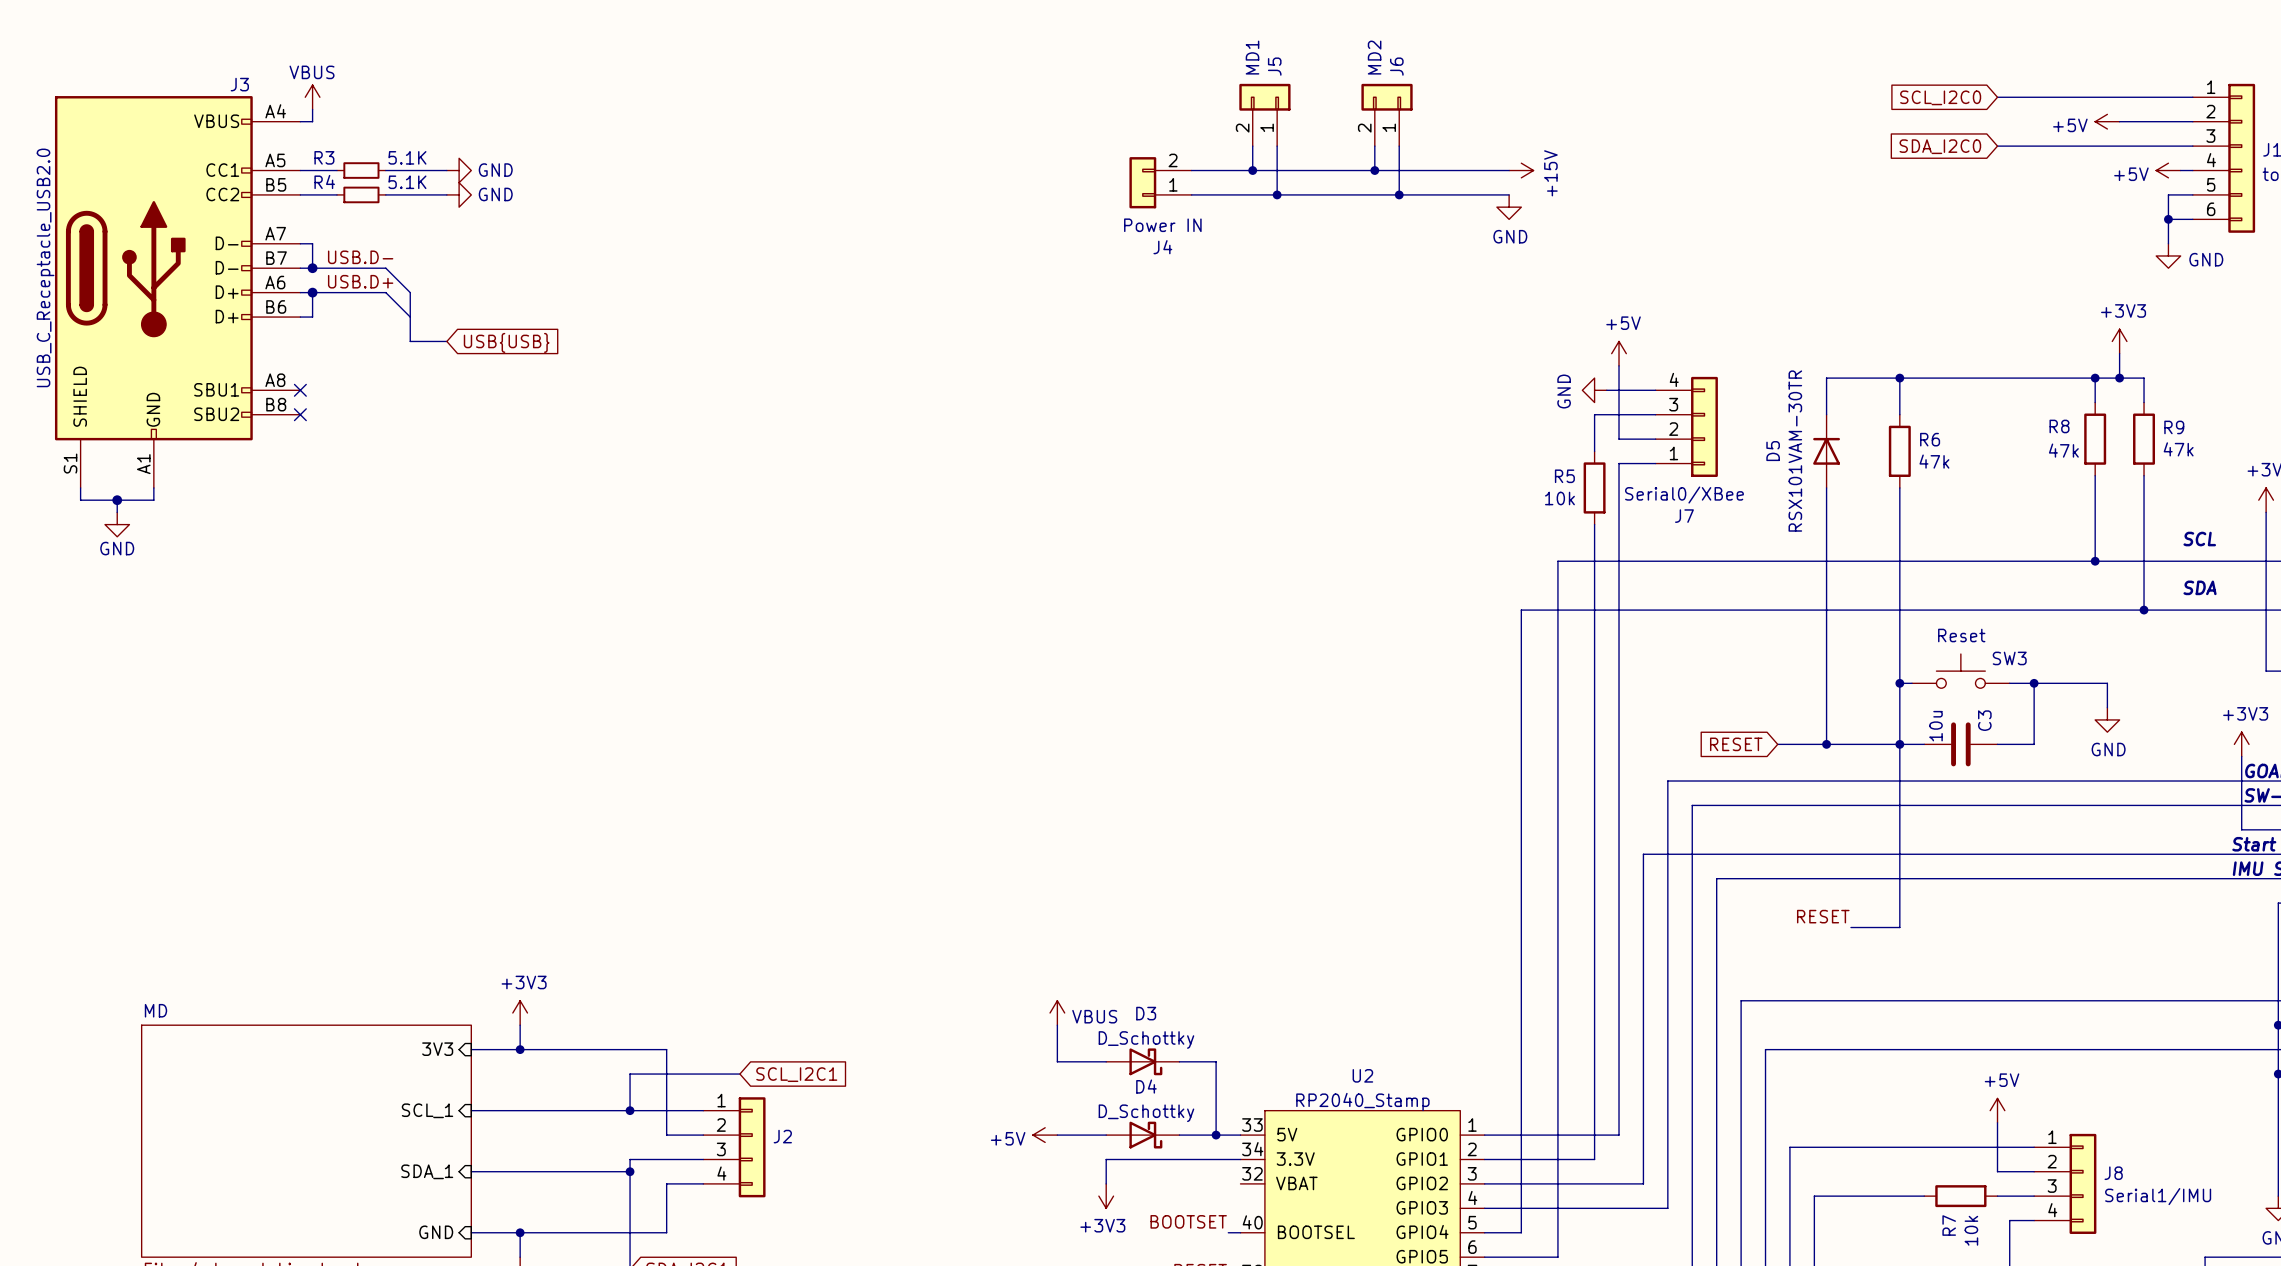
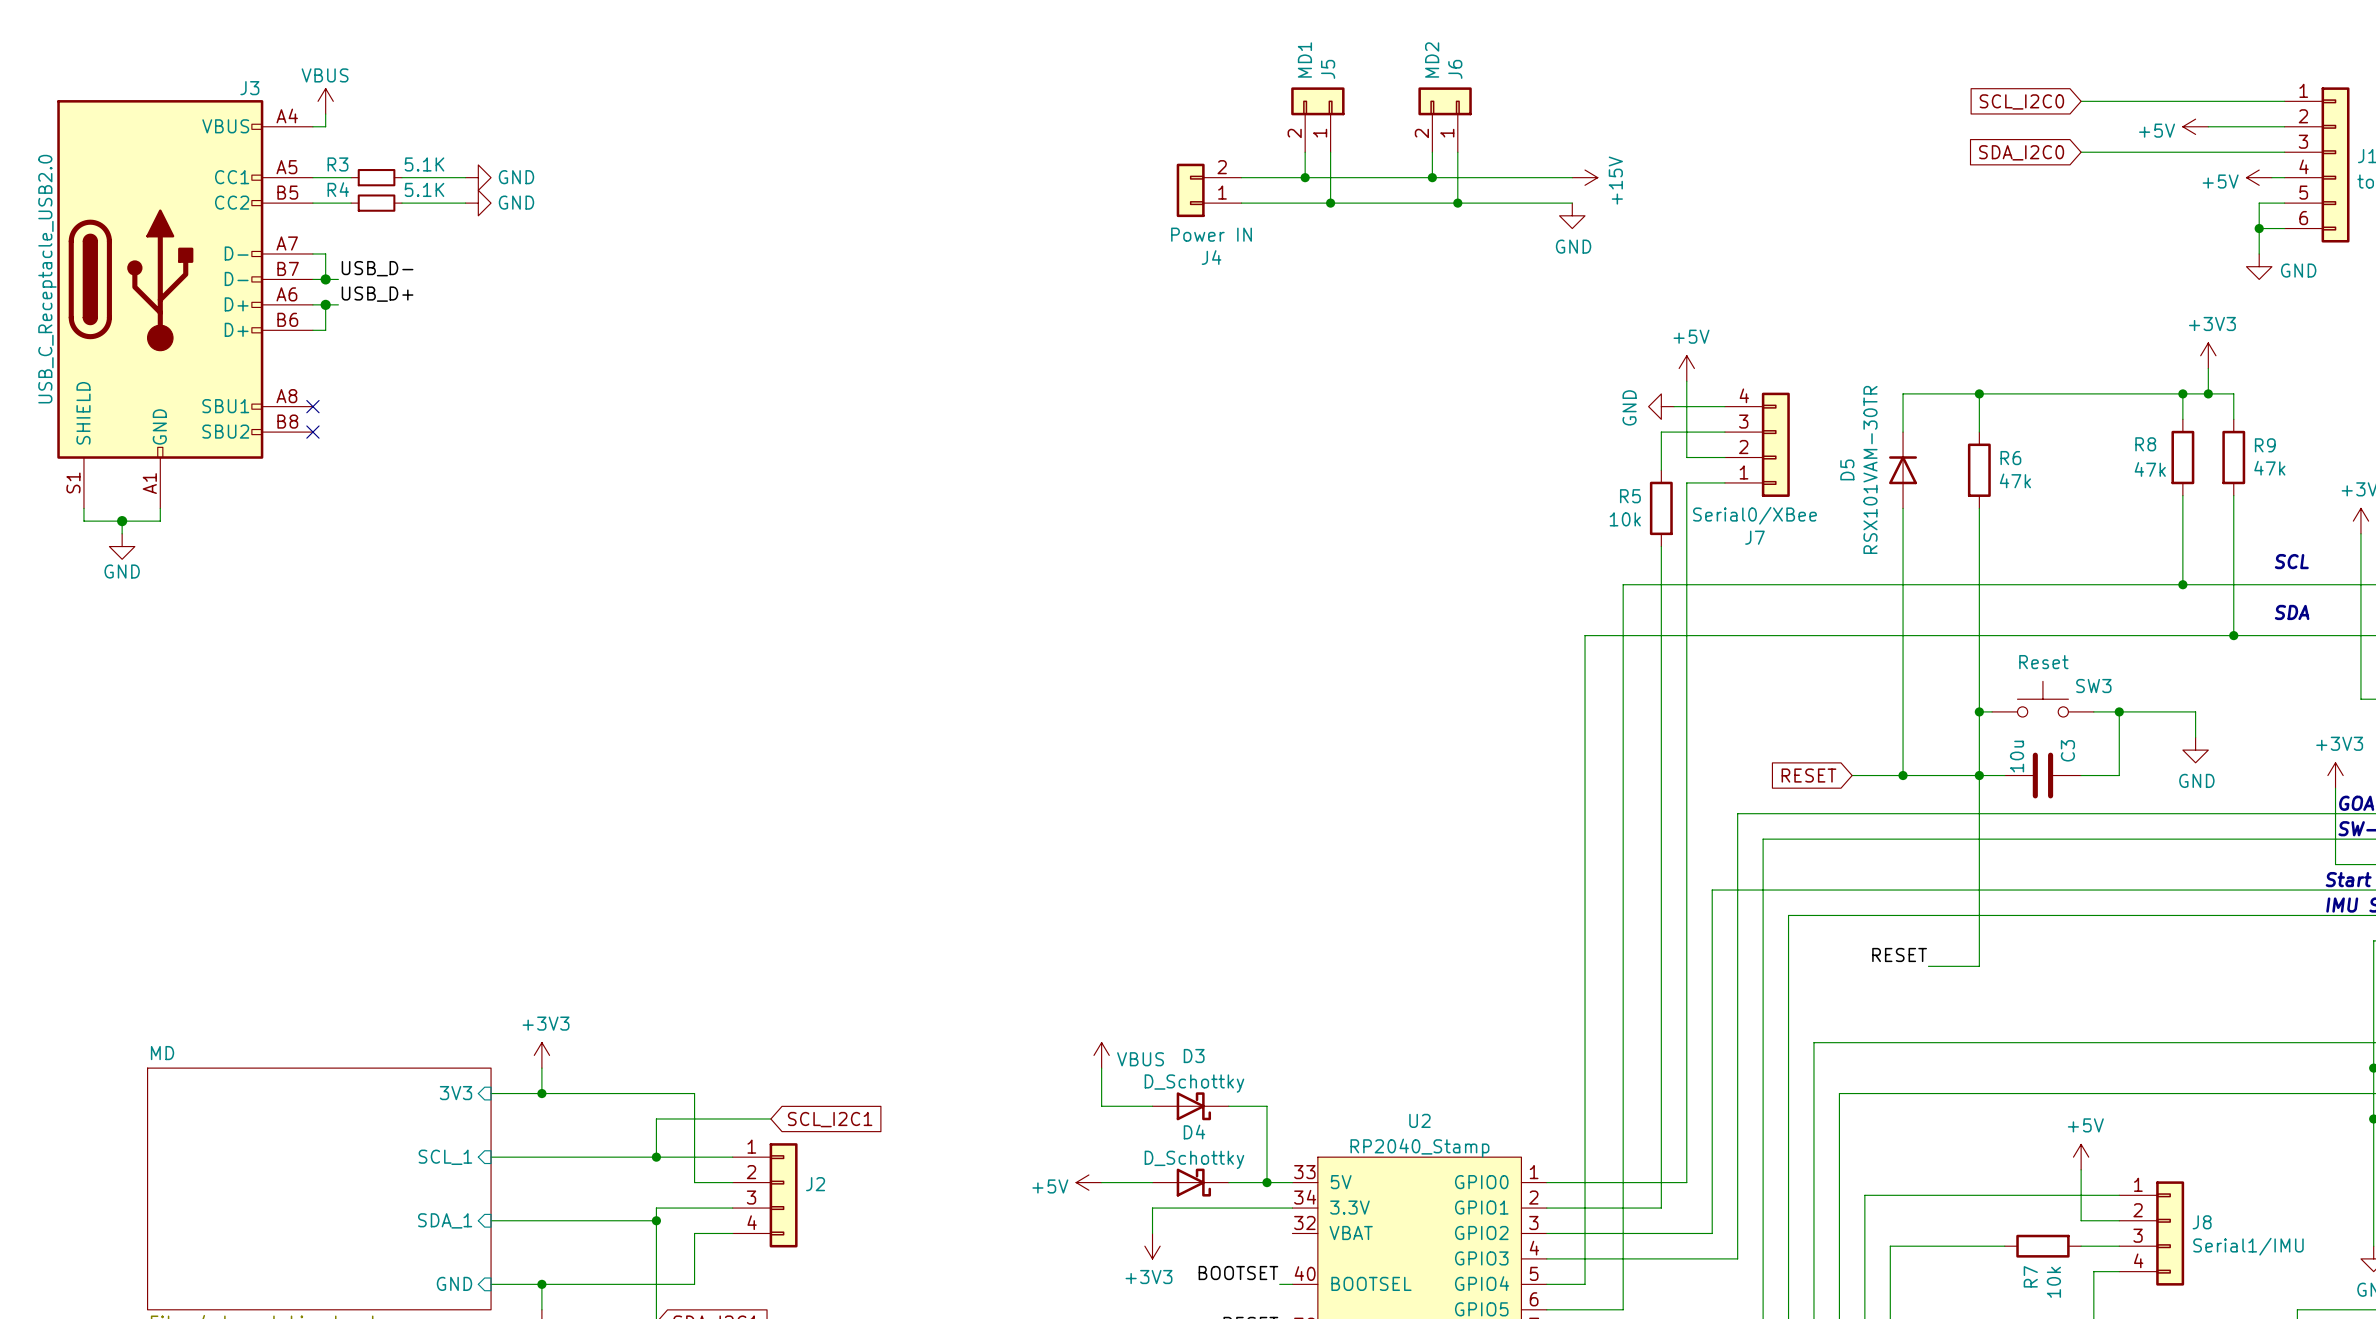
label: USB.D- (360, 257) -> USB_D- (377, 268)
wire: (324, 268) (385, 268) (410, 292) -> none
label: USB.D+ (360, 281) -> USB_D+ (377, 294)
wire: (324, 292) (385, 292) (410, 317) -> none
bus: (410, 292) (410, 341) (446, 341) -> none
global label: USB{USB} (506, 342) -> none

